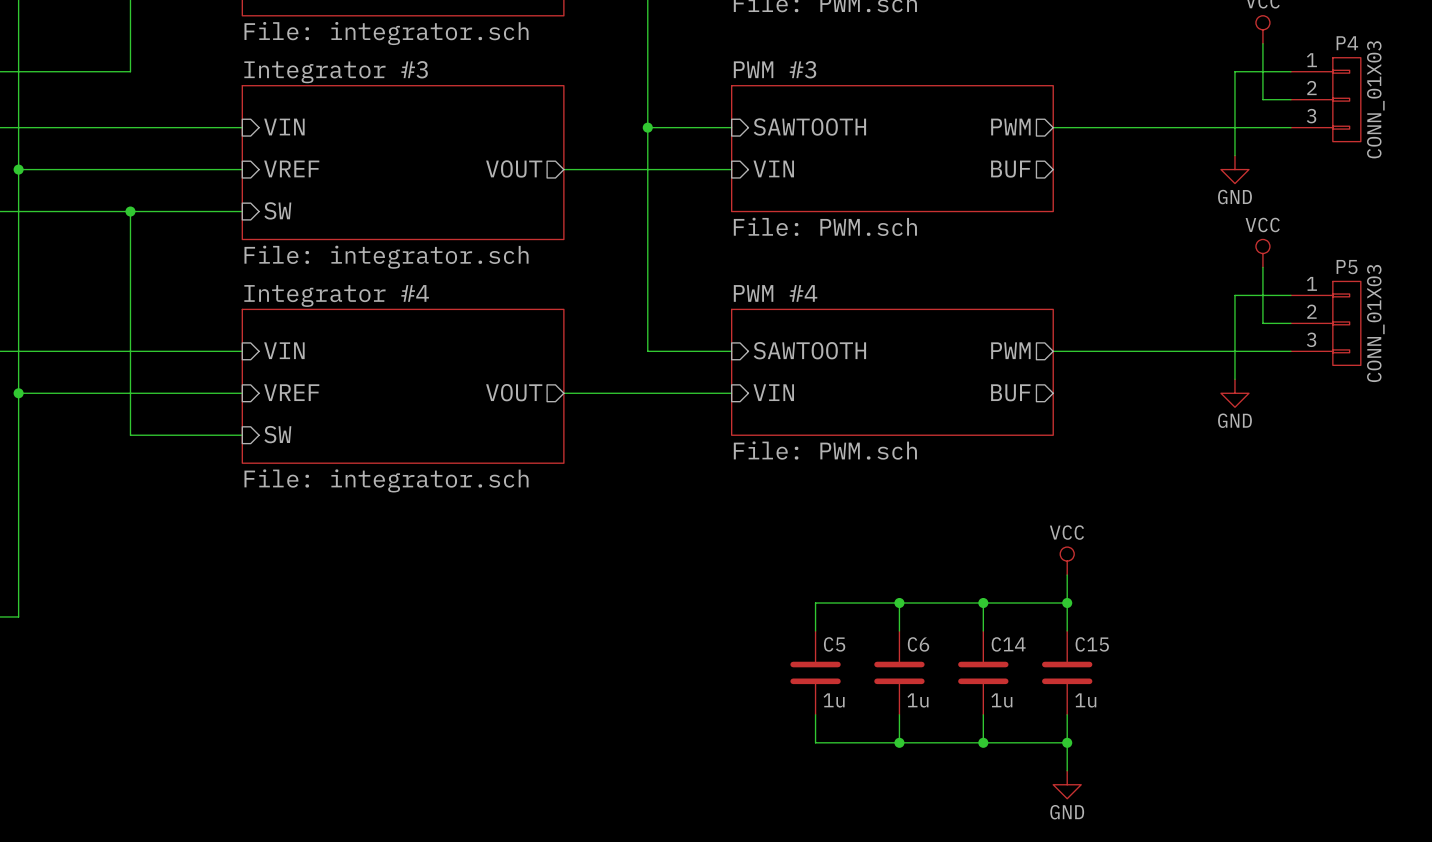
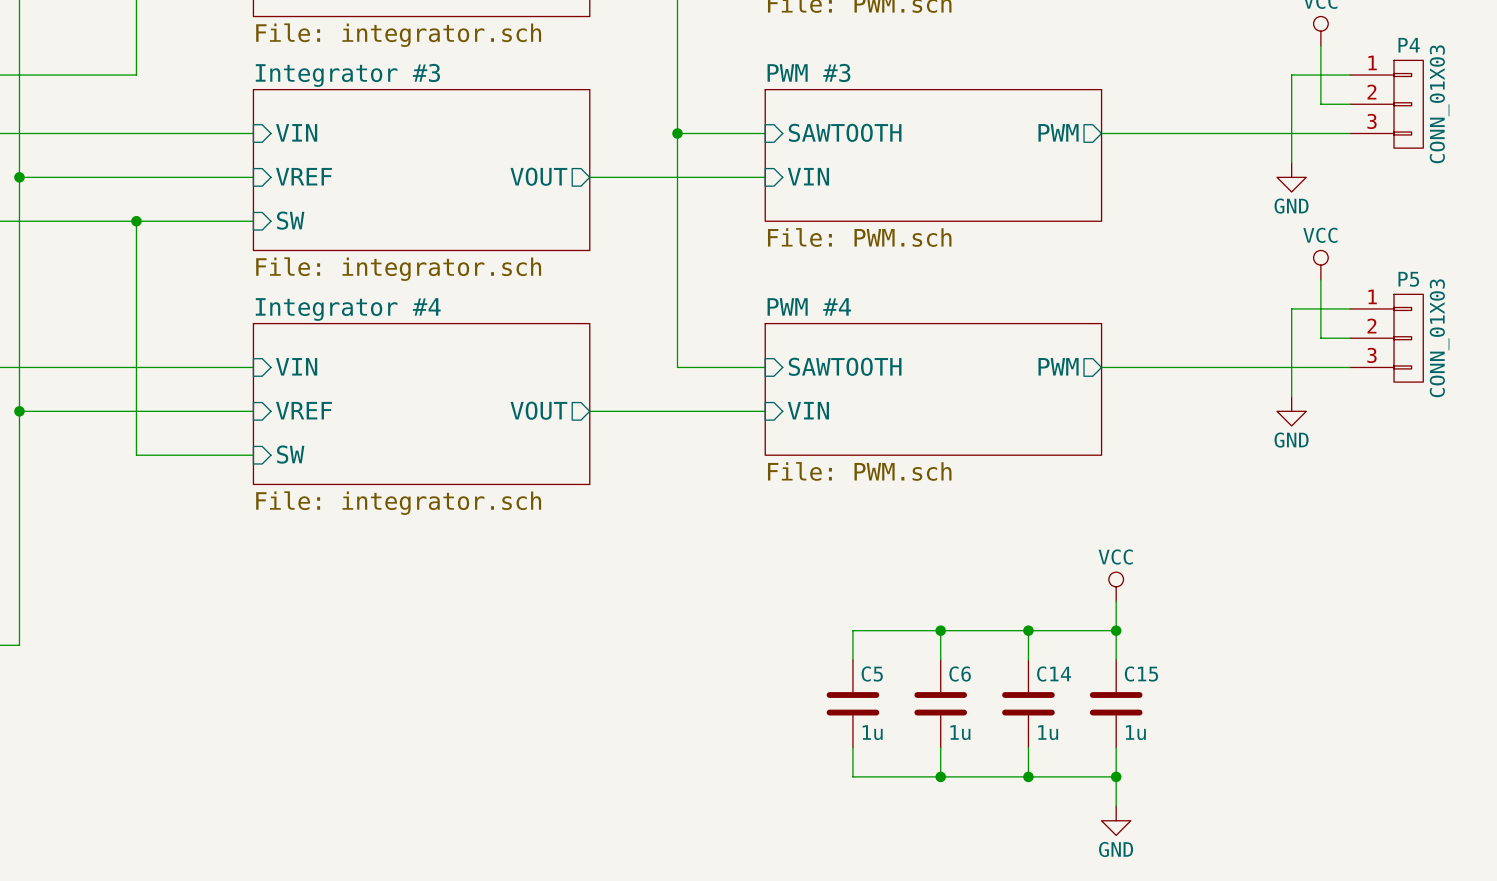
sheet pin: BUF (1010, 169) -> none
sheet pin: BUF (1010, 392) -> none

